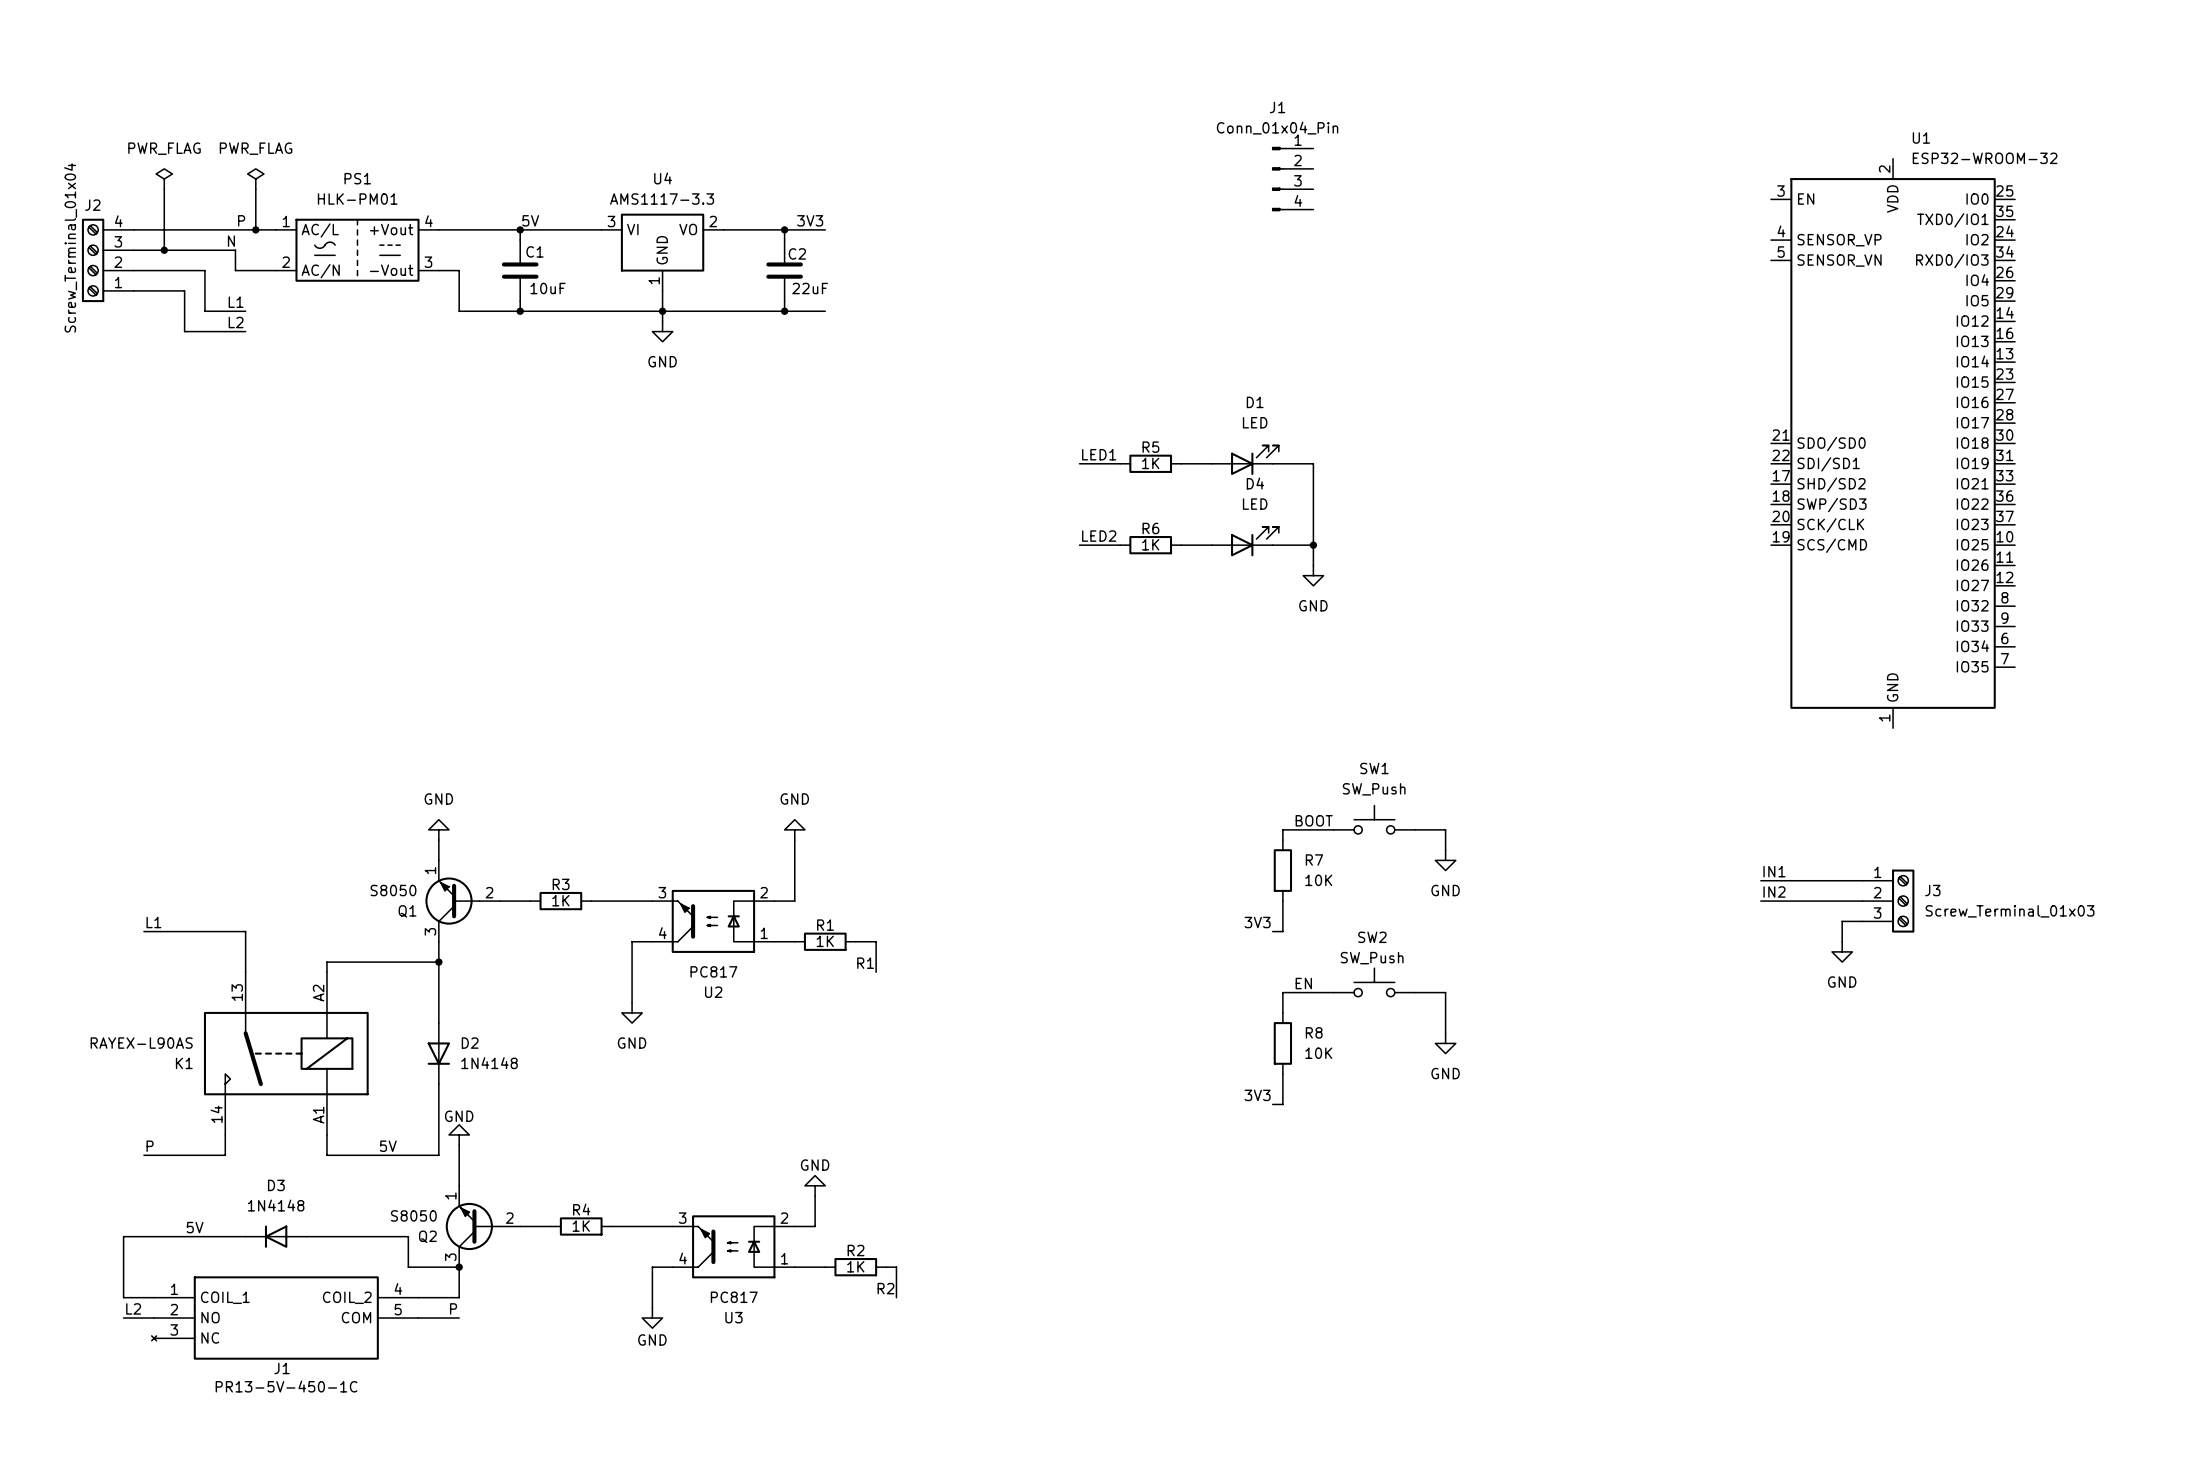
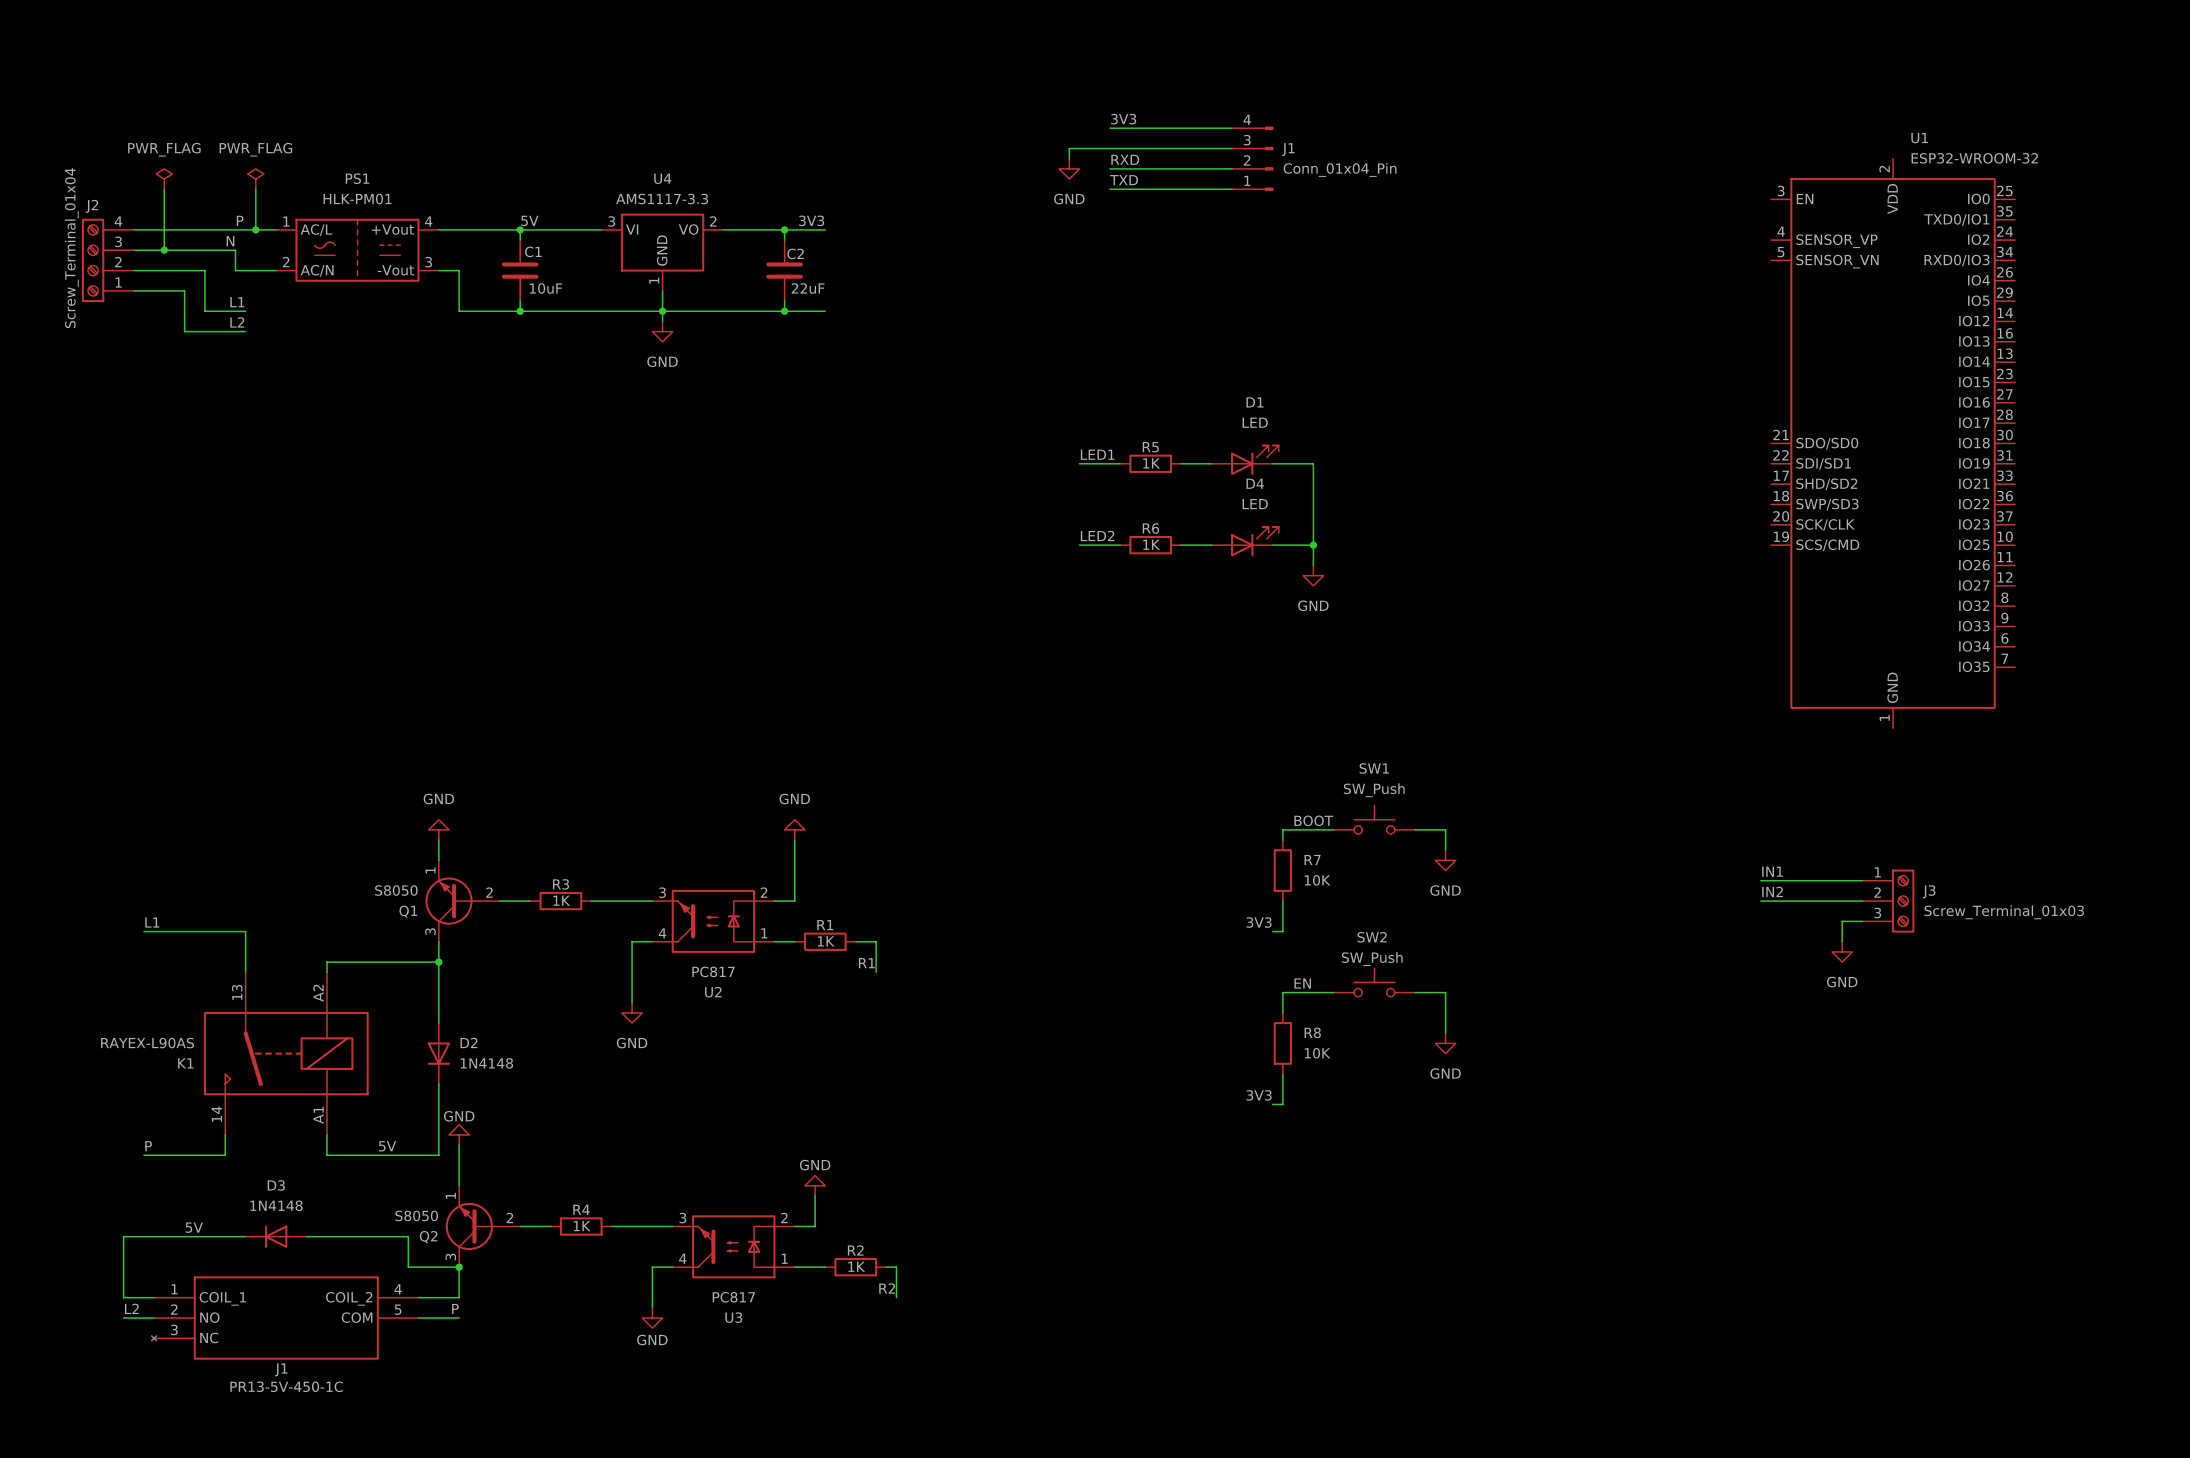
J1 name position: J1 (1277, 107) -> J1 (1288, 149)
label: none -> 3V3 (1123, 119)
wire: none -> (1110, 128) (1232, 128)
J1 value position: Conn_01x04_Pin (1277, 128) -> Conn_01x04_Pin (1340, 169)
wire: none -> (1232, 148) (1069, 148) (1069, 158)
label: none -> RXD (1125, 159)
power symbol: none -> GND (1069, 168)
wire: none -> (1110, 168) (1232, 168)
J1 rotation: 0° (1277, 179) -> 180° (1267, 158)
J1 position: (1292, 179) -> (1252, 158)
label: none -> TXD (1123, 180)
wire: none -> (1110, 189) (1232, 189)

